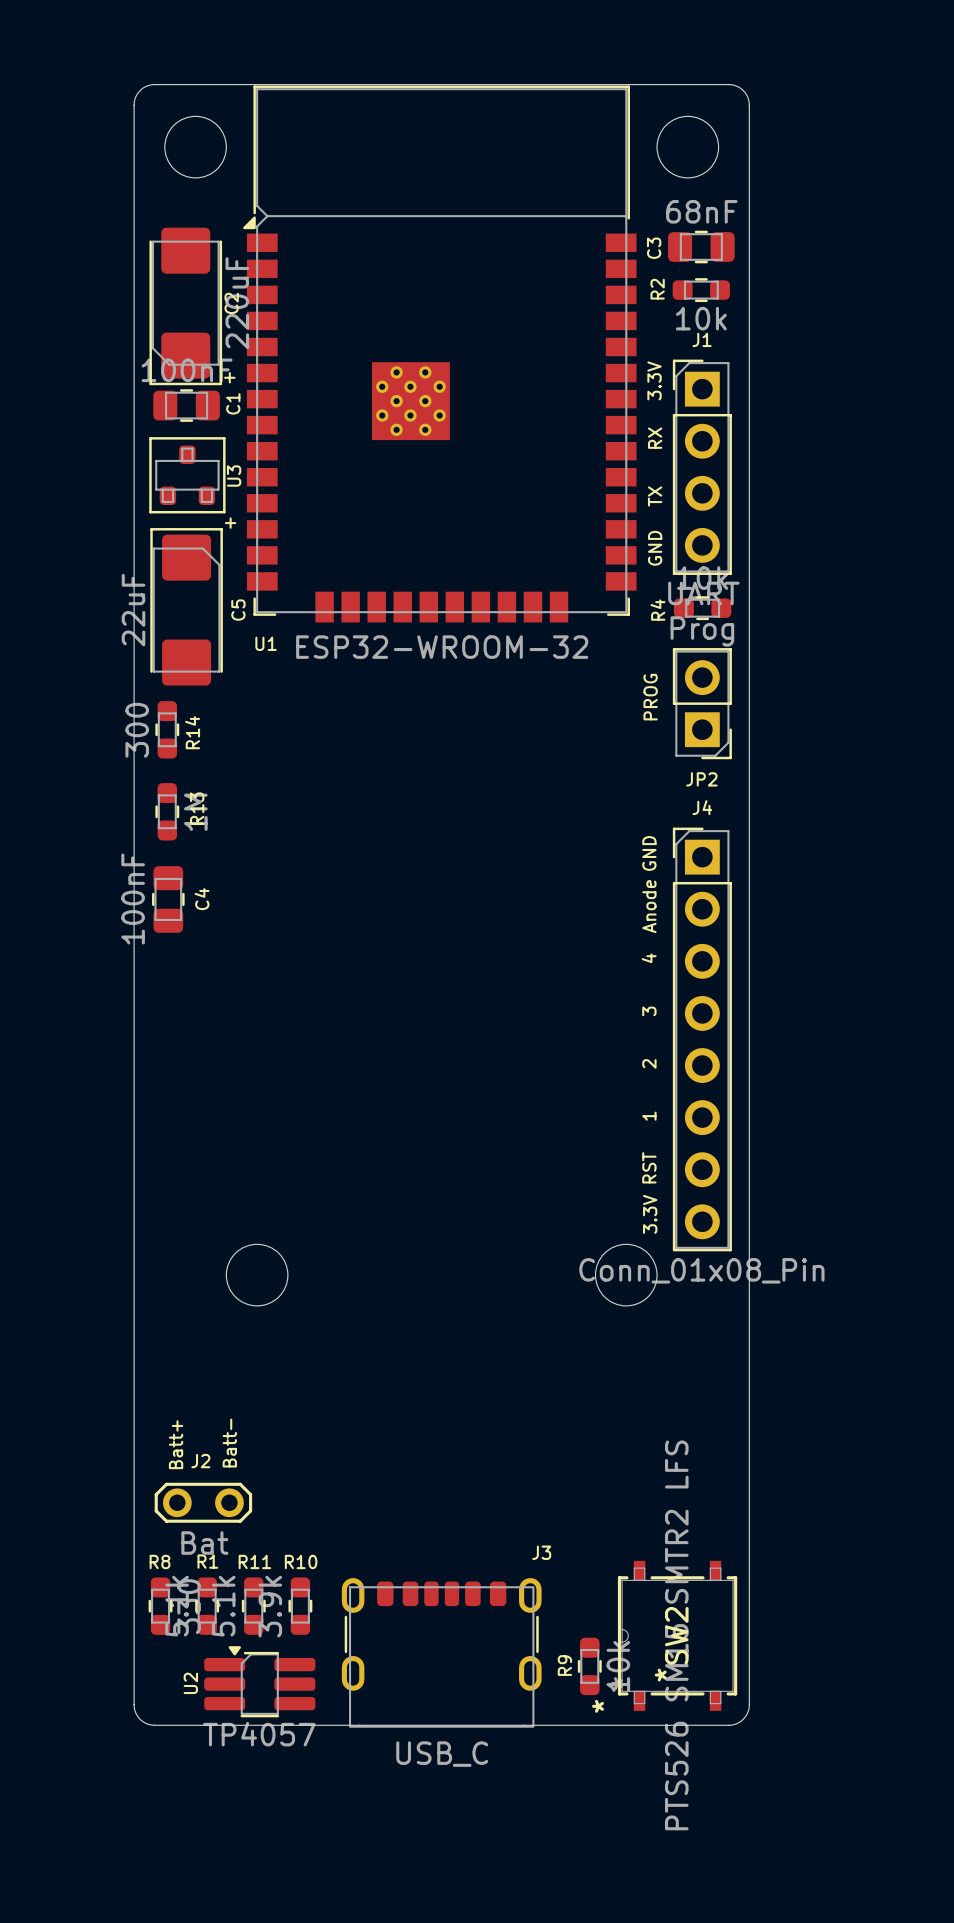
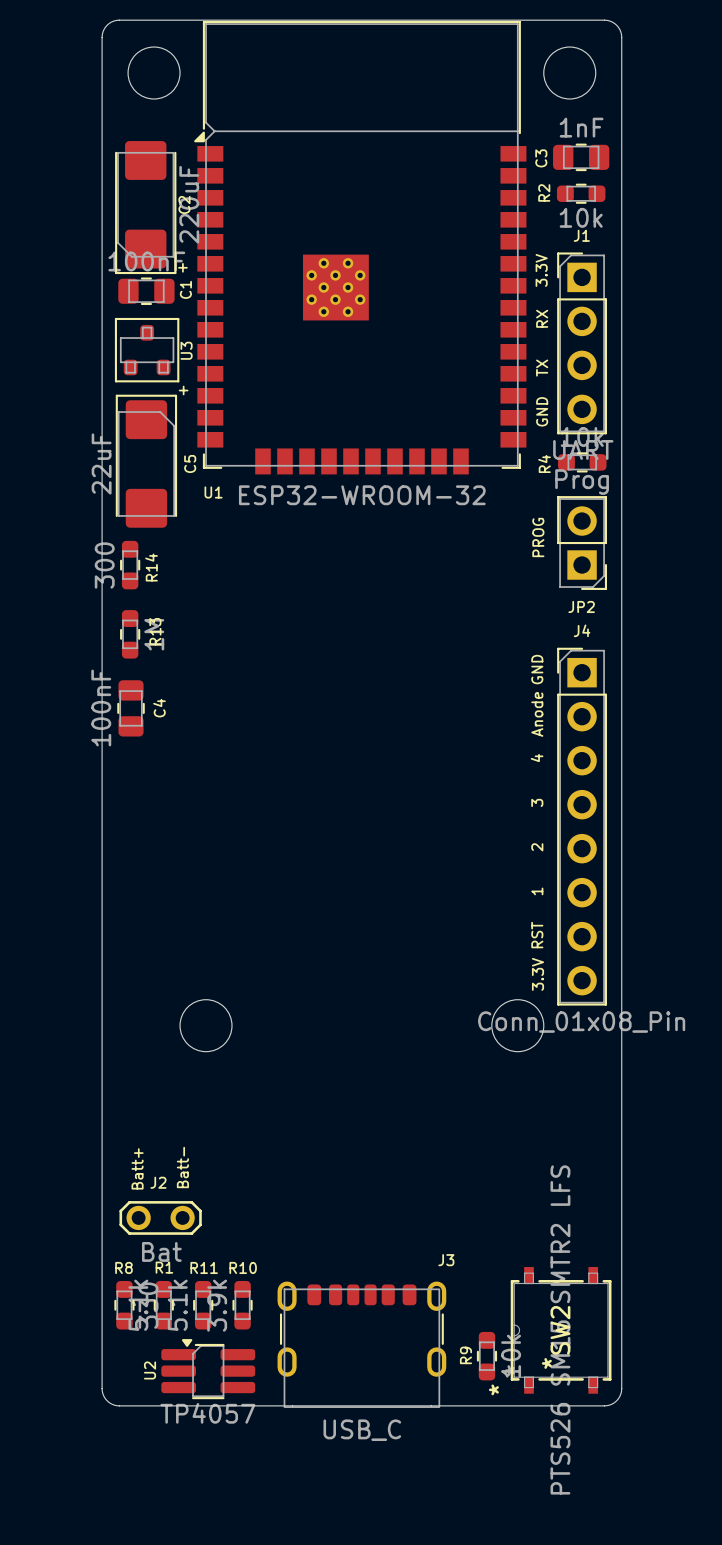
C3 value: 68nF (701, 211) -> 1nF (581, 127)

